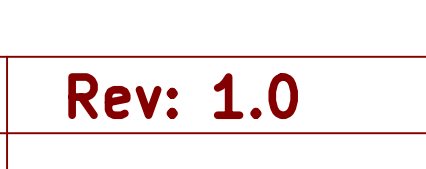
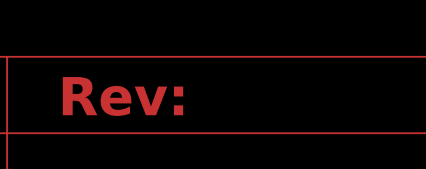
title block: Rev: 1.0 (183, 96) -> Rev: (123, 96)

